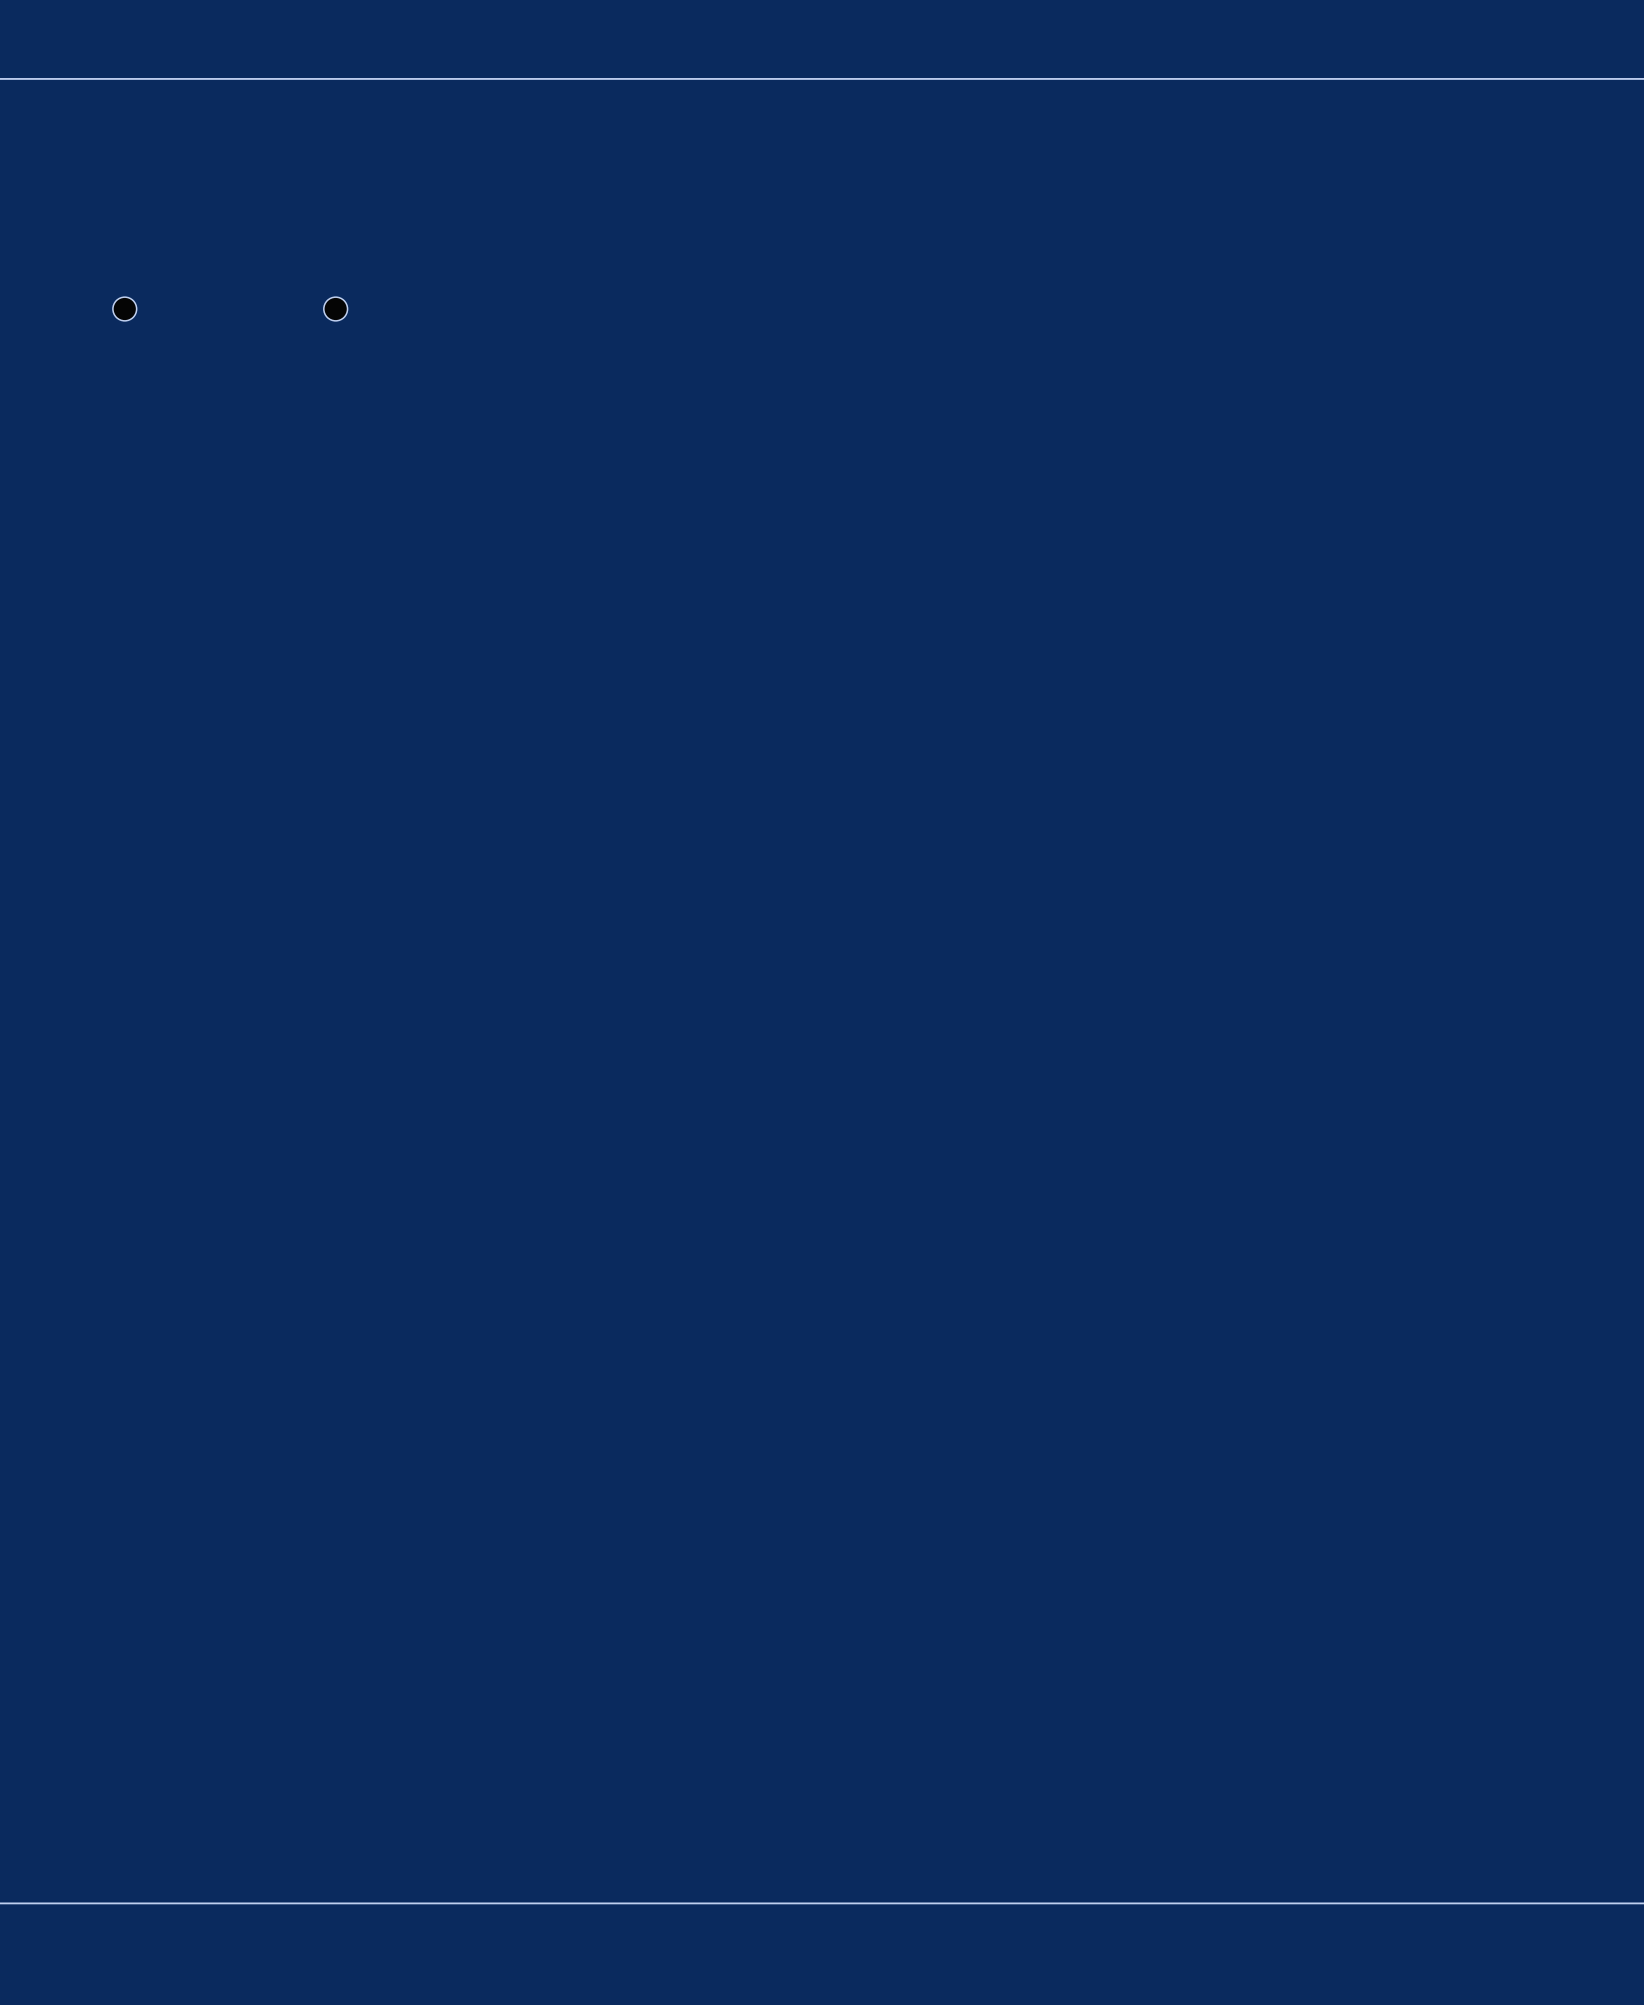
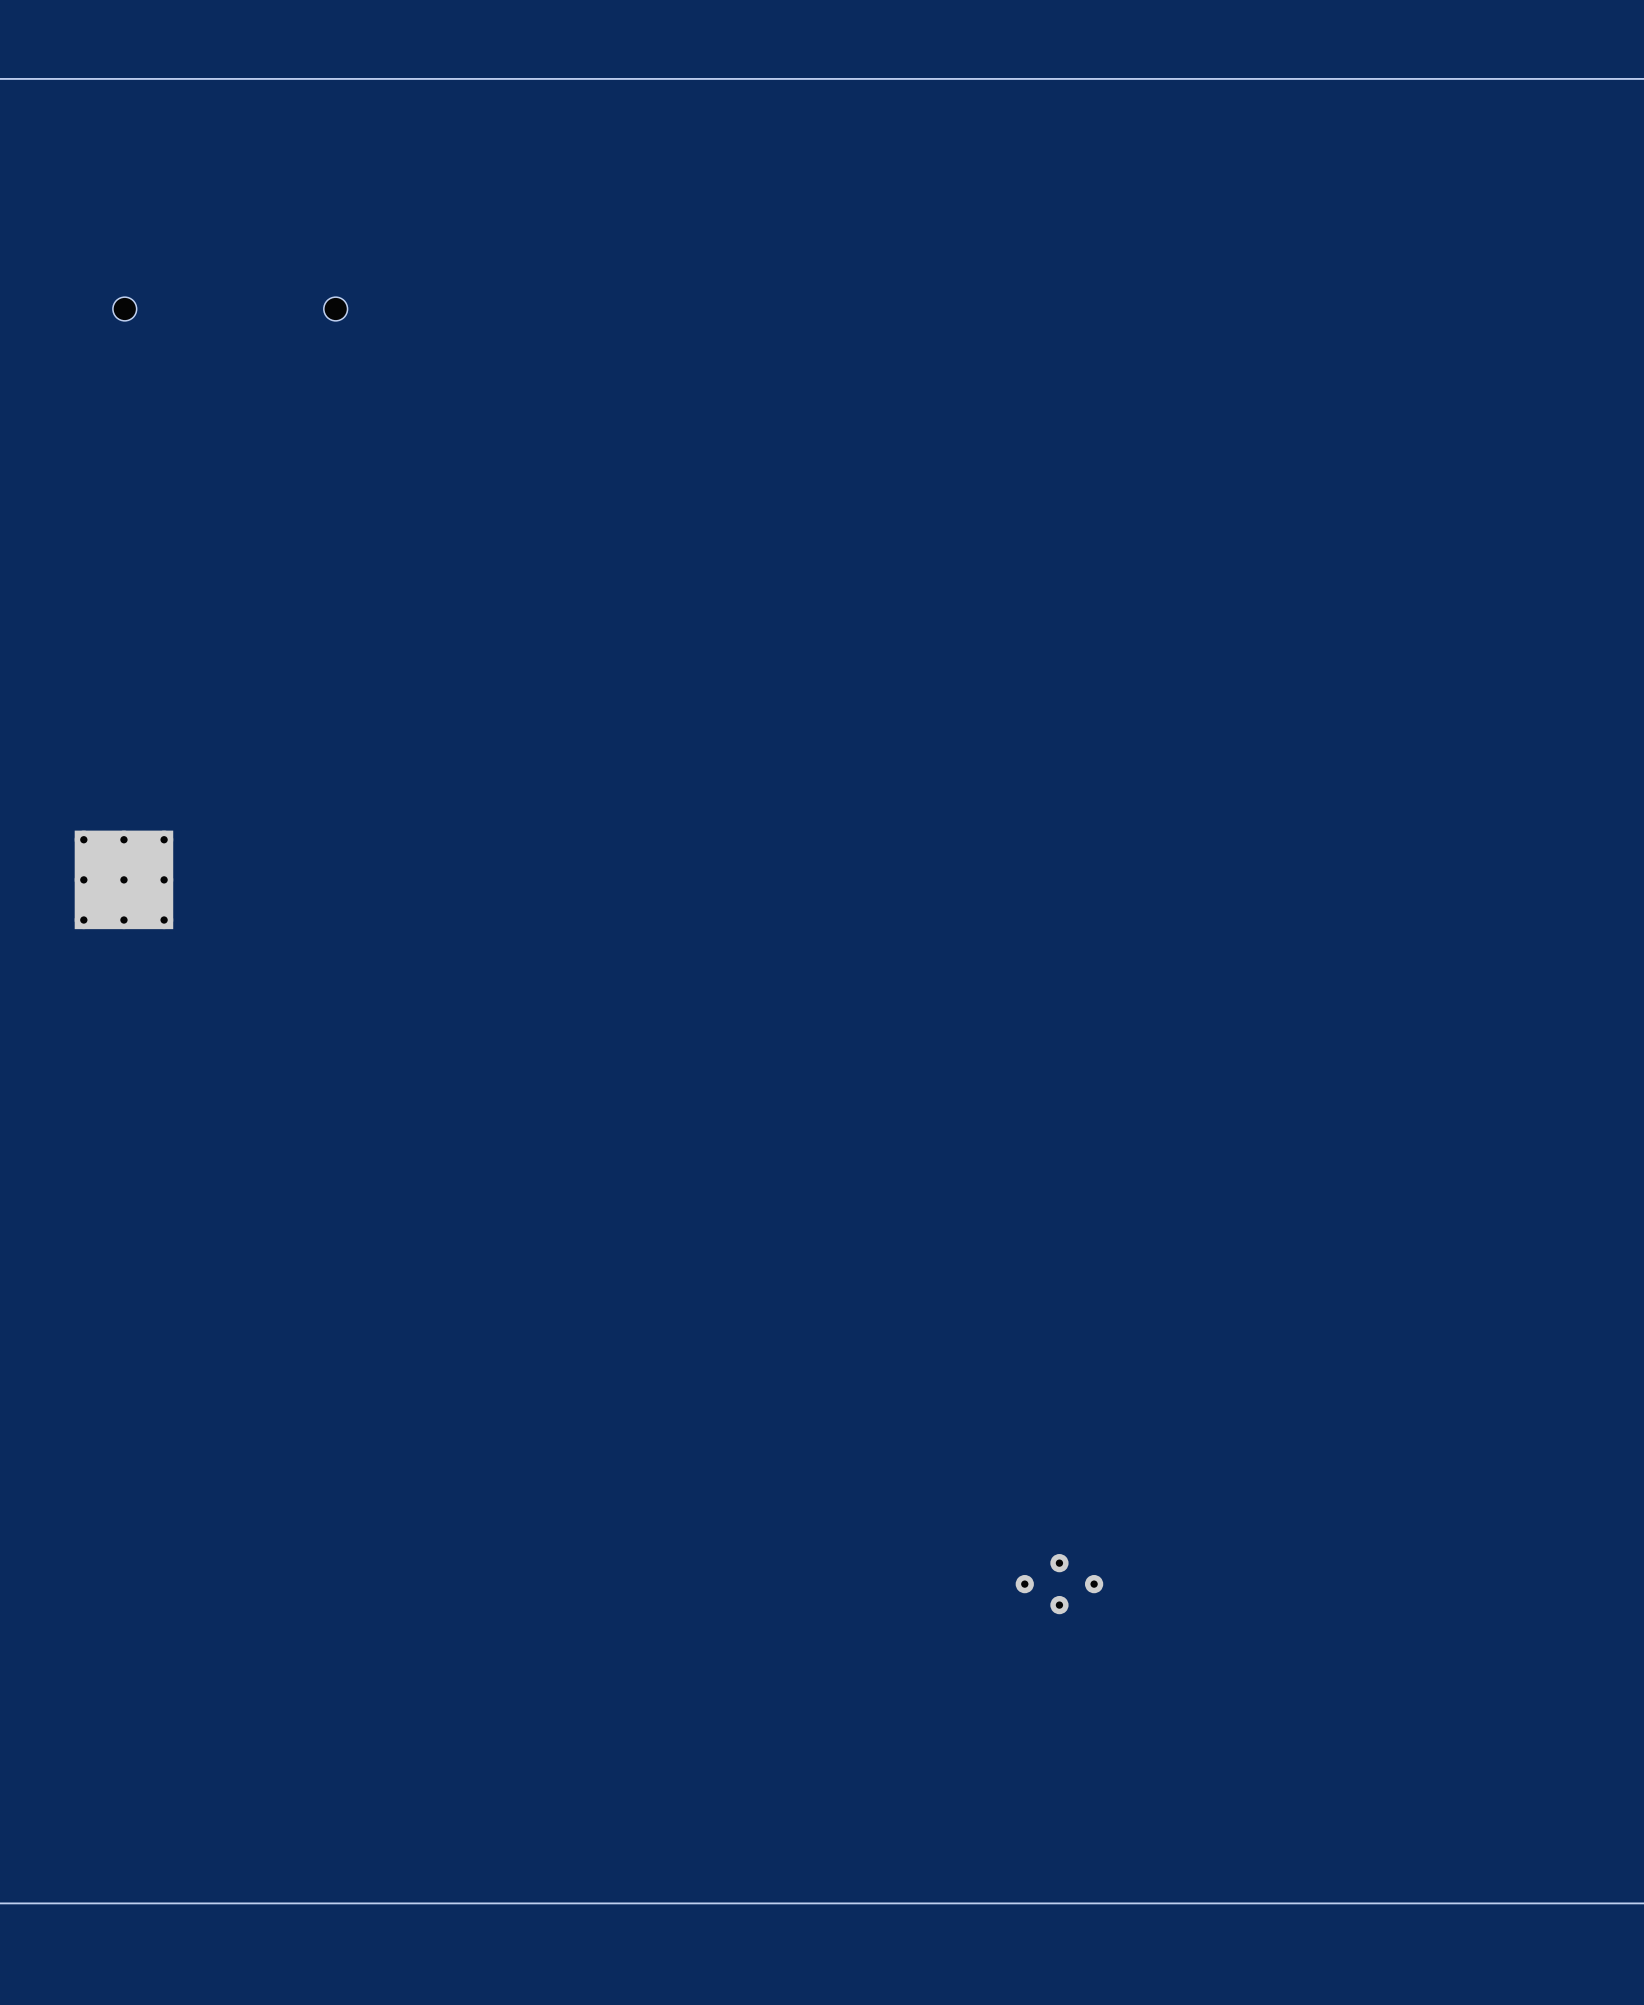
part: none -> (123, 879)
part: none -> (1059, 1584)

